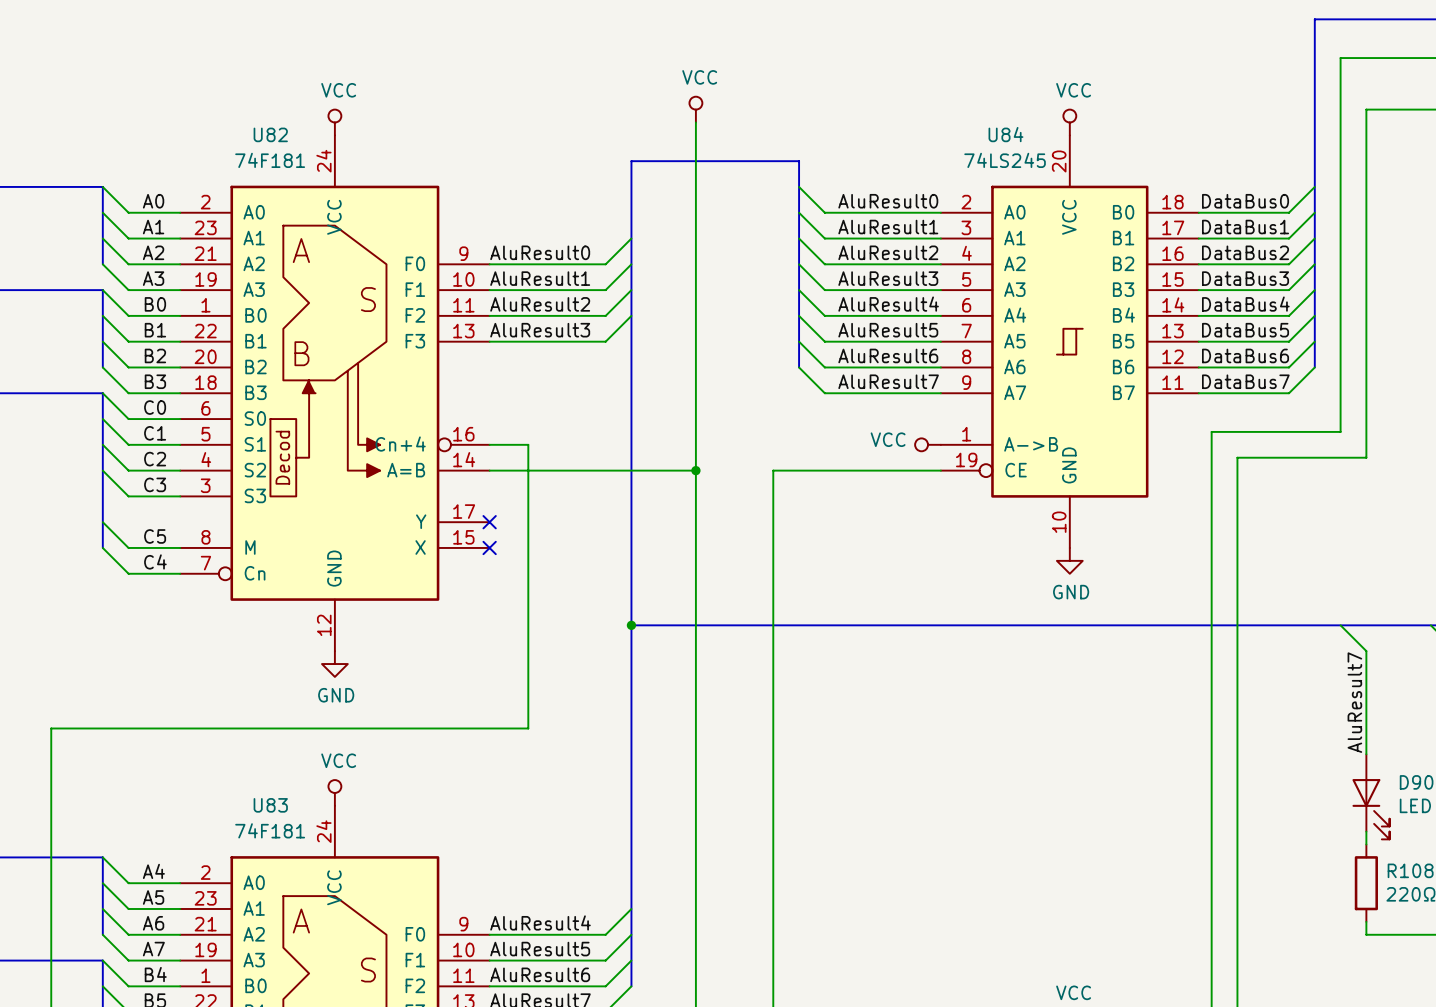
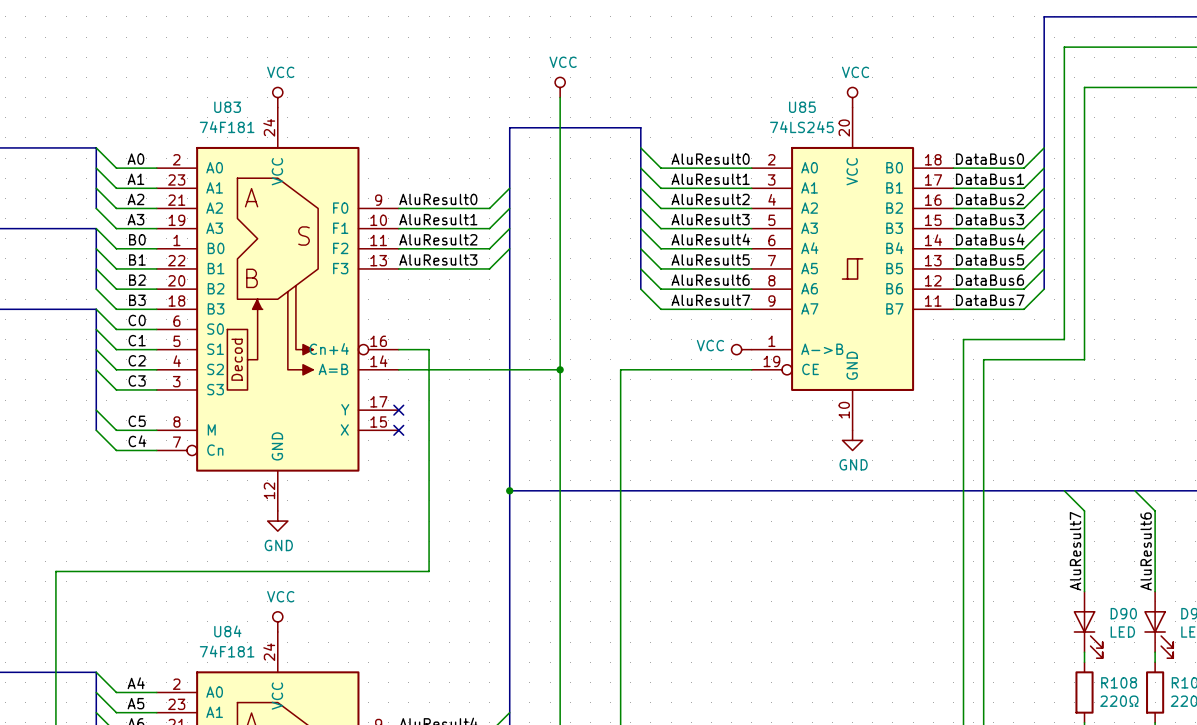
U82 name: U82 (270, 134) -> U83 (227, 107)
U84 name: U84 (1005, 134) -> U85 (802, 107)
U83 name: U83 (270, 805) -> U84 (227, 631)

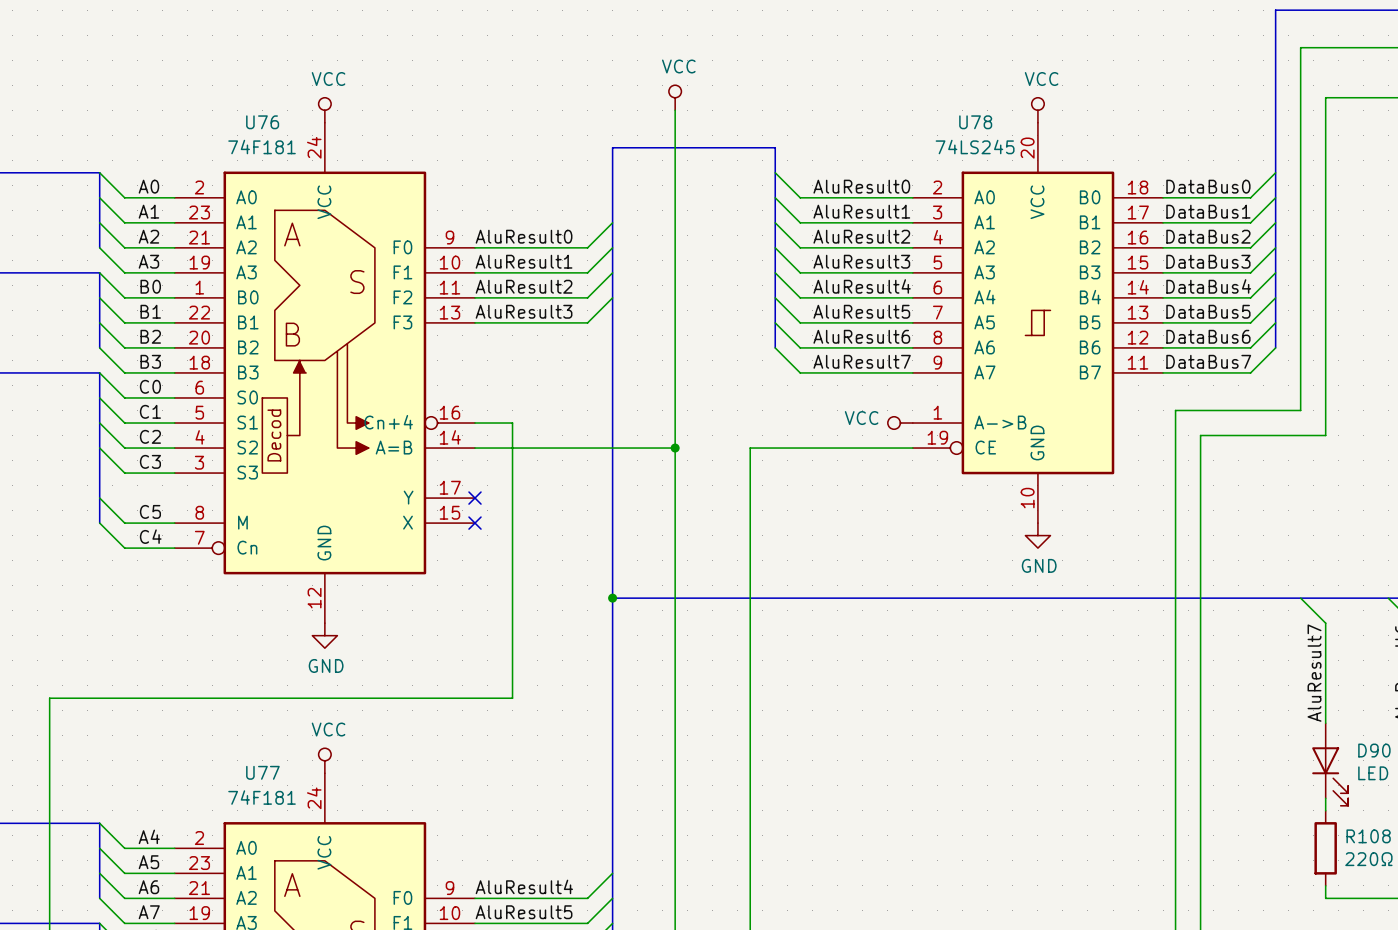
U83 name: U83 (227, 107) -> U76 (262, 122)
U85 name: U85 (802, 107) -> U78 (975, 122)
U84 name: U84 (227, 631) -> U77 (262, 772)

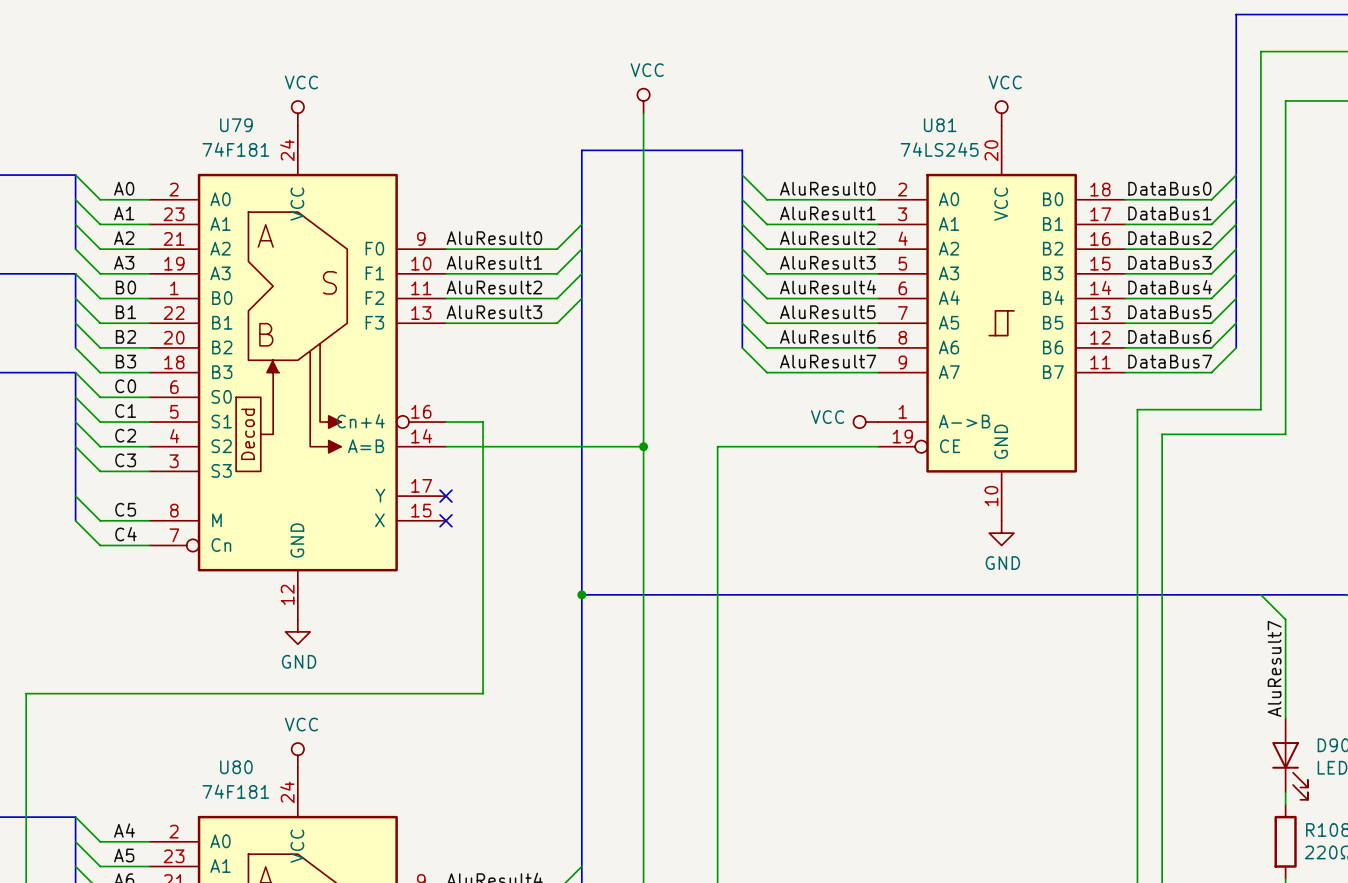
U76 name: U76 (262, 122) -> U79 (236, 125)
U78 name: U78 (975, 122) -> U81 (940, 125)
U77 name: U77 (262, 772) -> U80 (236, 767)

